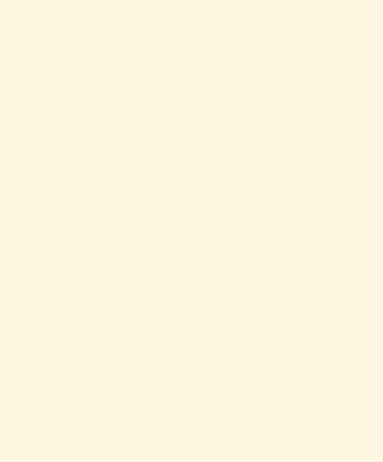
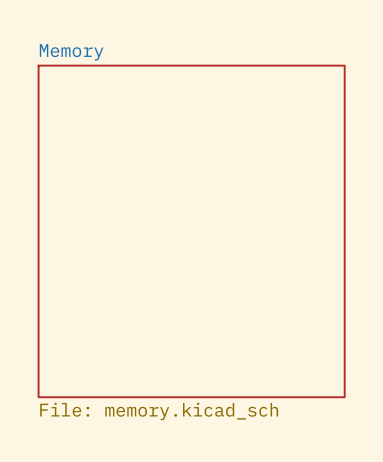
sheet Memory: none -> File: memory.kicad_sch (191, 231)

